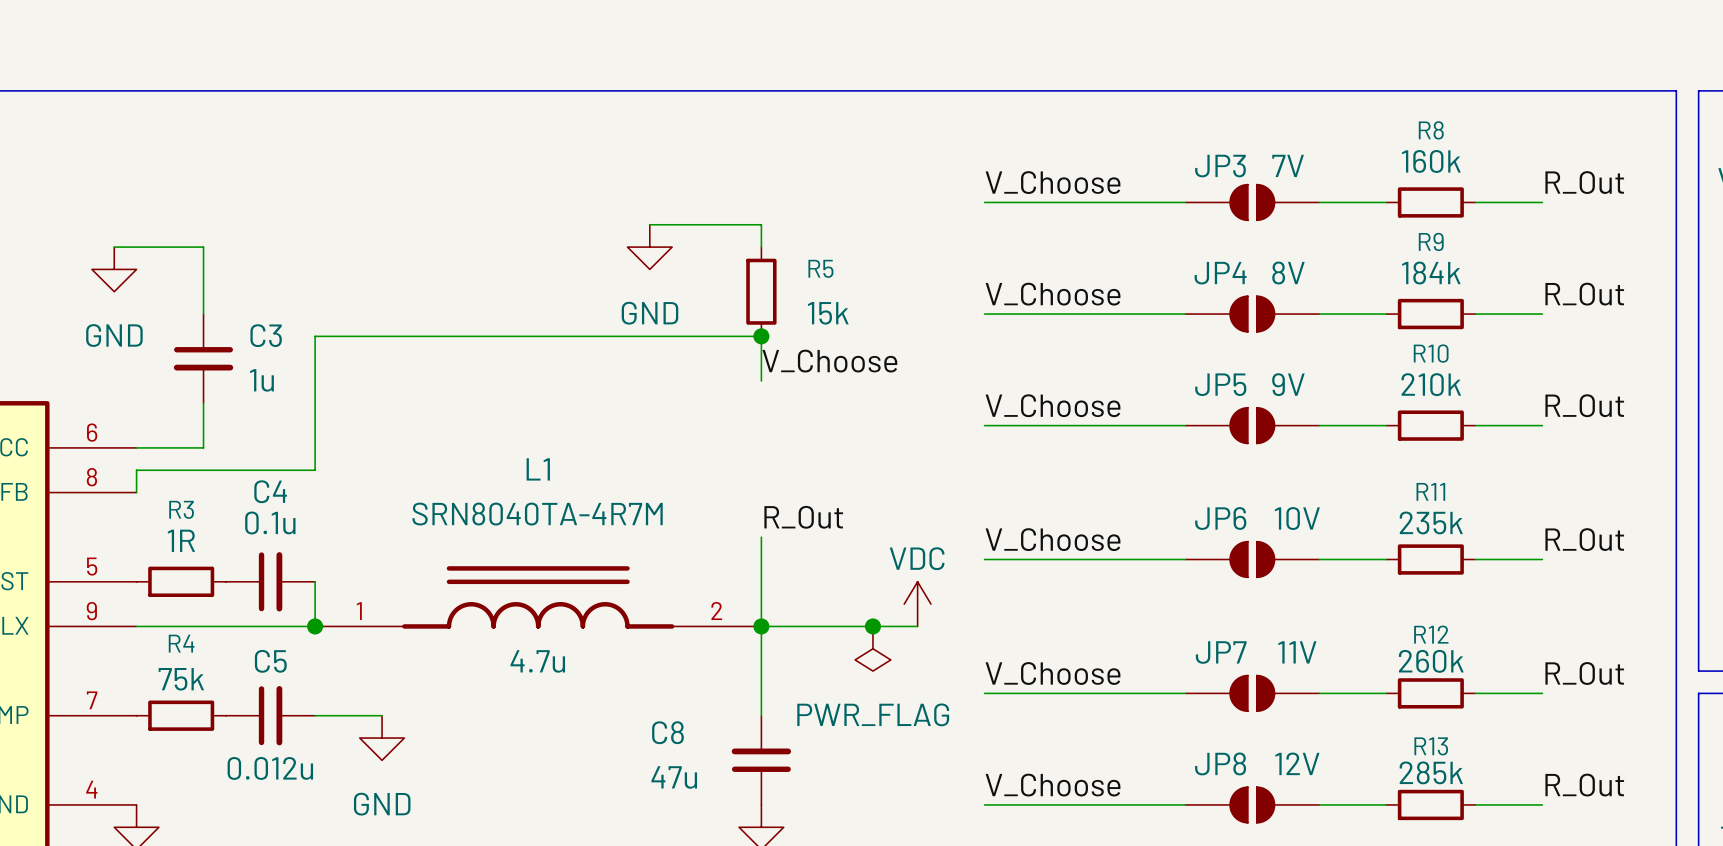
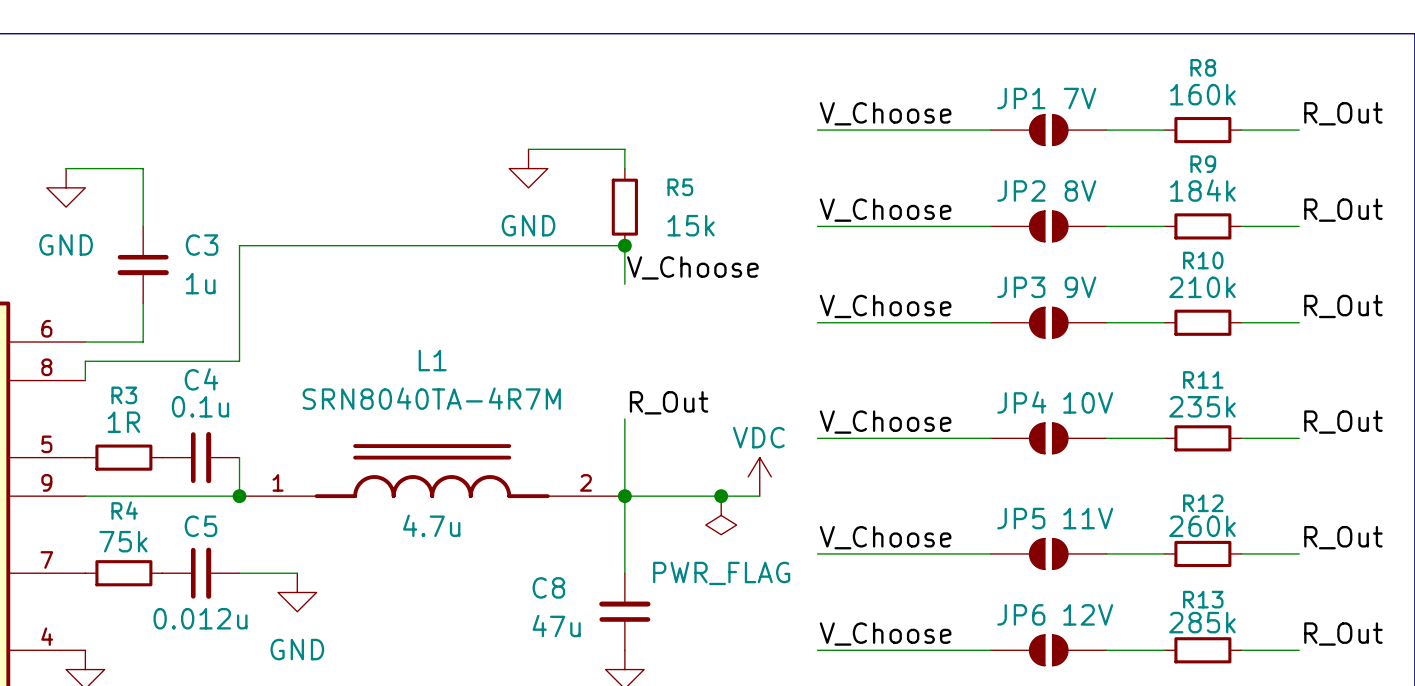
JP3 name: JP3 (1220, 166) -> JP1 (1021, 98)
JP4 name: JP4 (1220, 273) -> JP2 (1021, 191)
JP5 name: JP5 (1220, 384) -> JP3 (1021, 287)
JP6 name: JP6 (1220, 518) -> JP4 (1021, 402)
JP7 name: JP7 (1221, 652) -> JP5 (1021, 518)
JP8 name: JP8 (1220, 763) -> JP6 (1021, 614)

